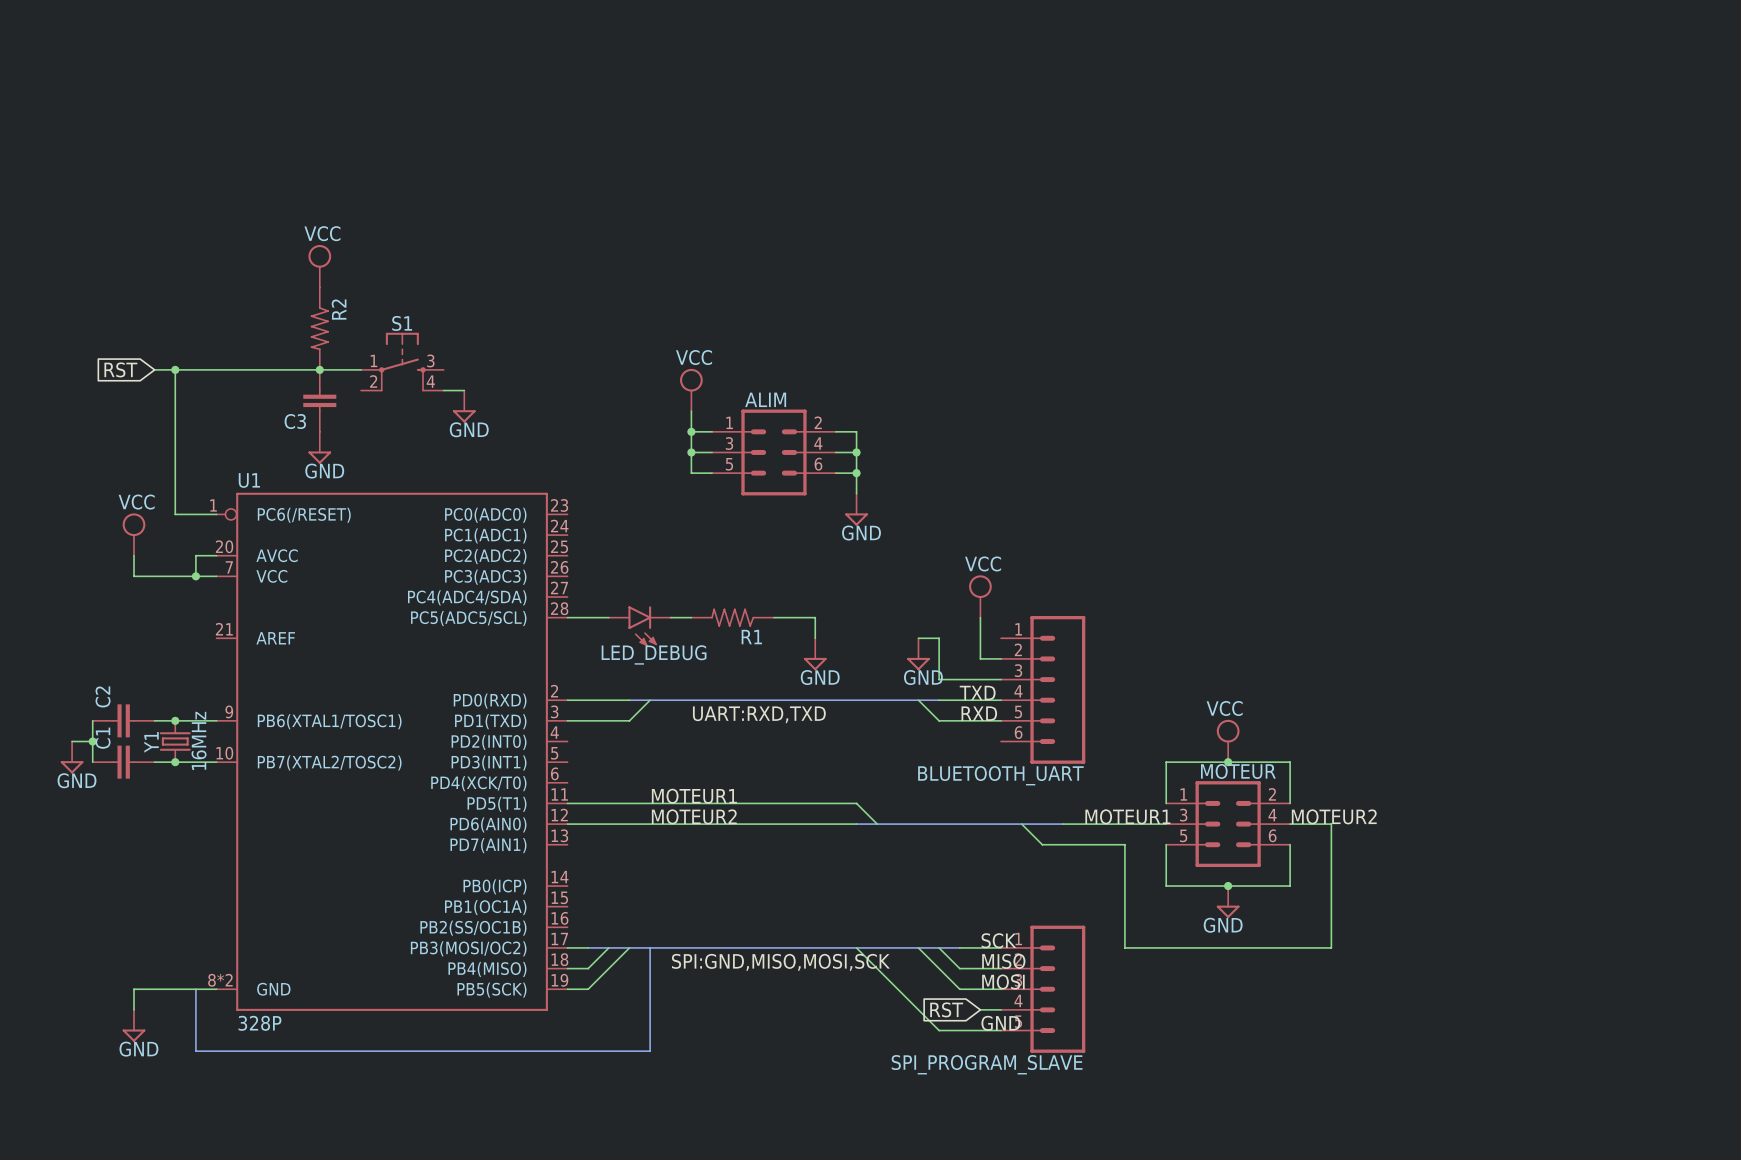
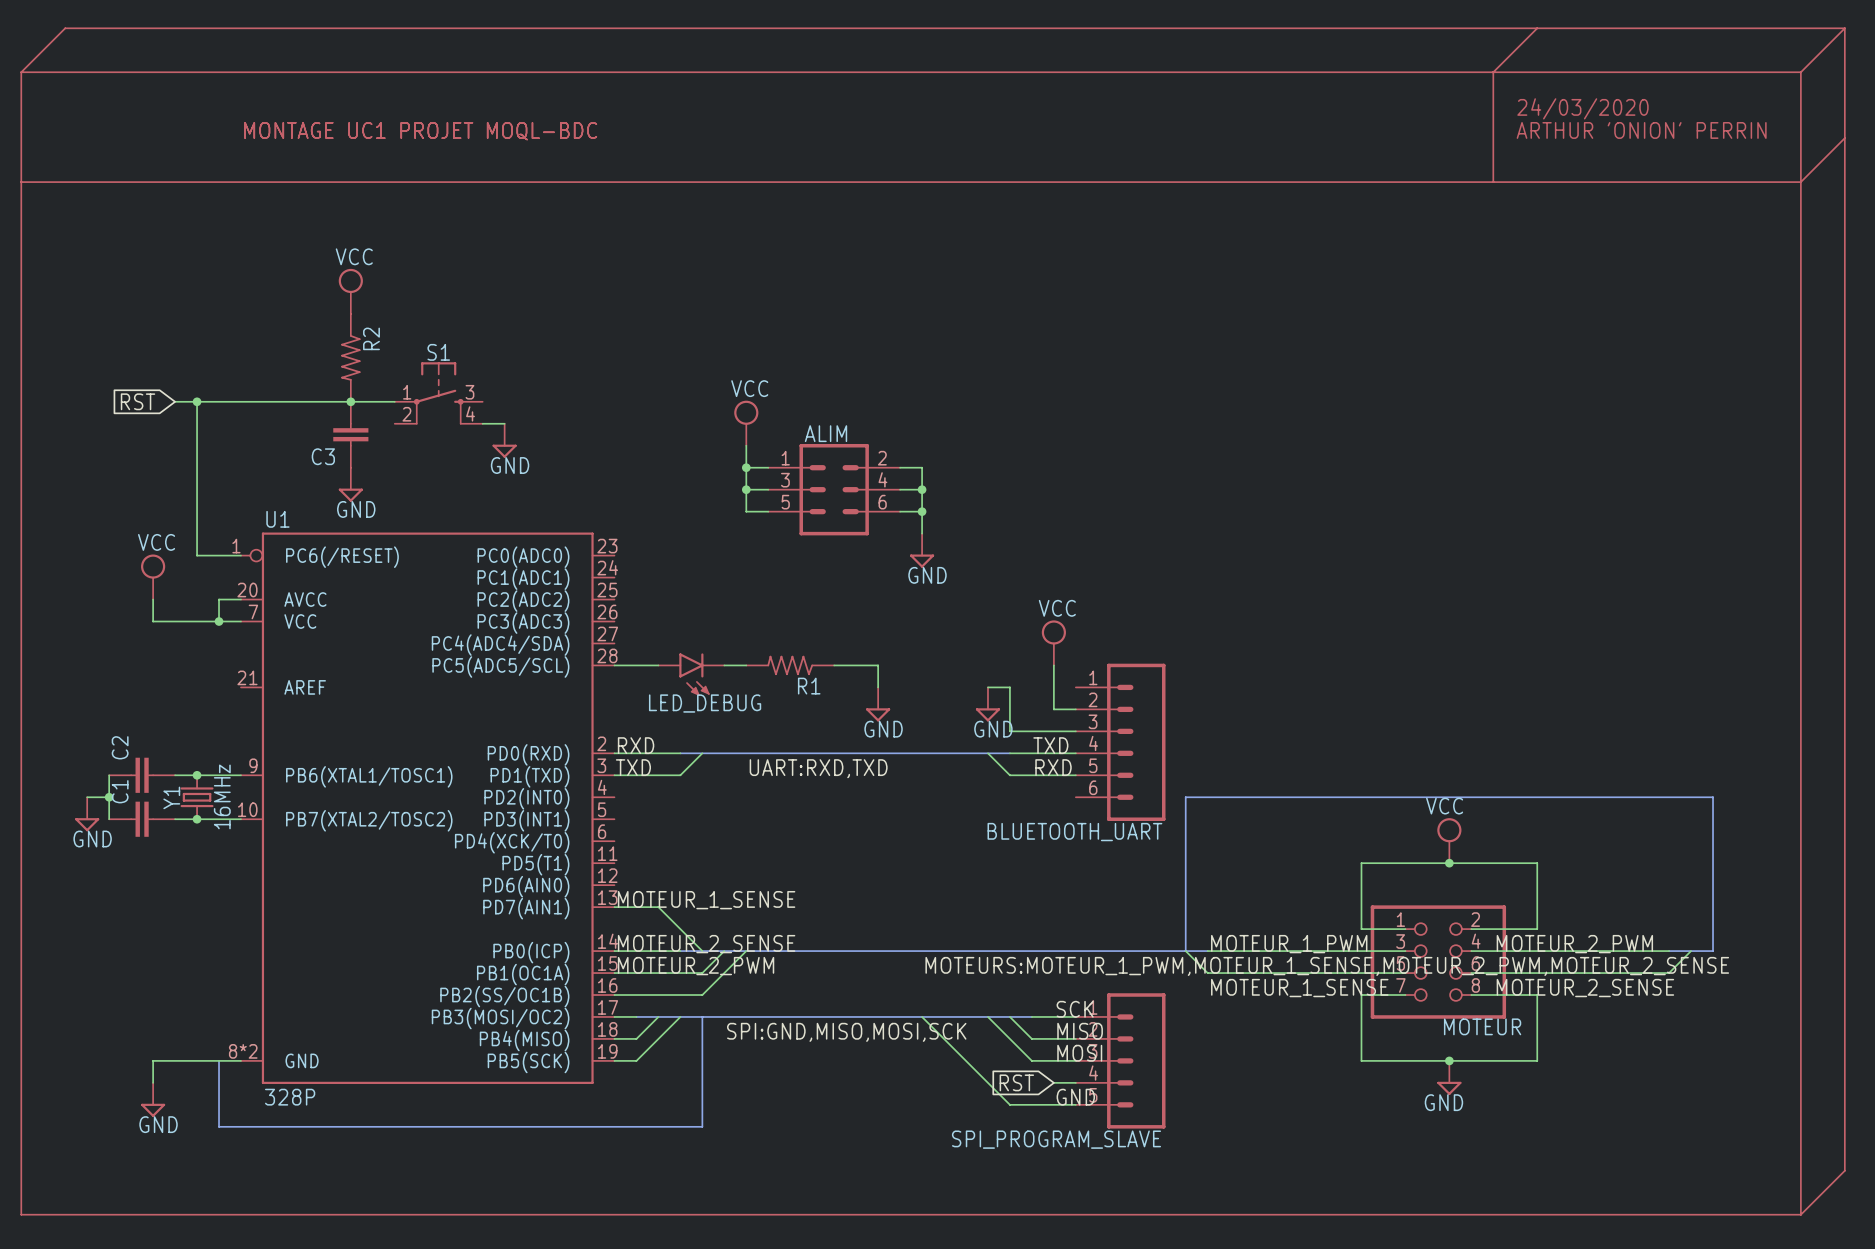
line: none -> (1537, 28) (1493, 72) (1493, 182)
line: none -> (1844, 28) (1844, 1170) (1800, 1214)
line: none -> (1844, 28) (1800, 72)
line: none -> (1844, 28) (65, 28) (21, 72)
line: none -> (21, 72) (21, 1214) (1800, 1214)
line: none -> (21, 72) (1800, 72)
line: none -> (1800, 72) (1800, 1214)
text: none -> 24/03/2020 (1582, 108)
text: none -> ARTHUR 'ONION' PERRIN (1641, 130)
text: none -> MONTAGE UC1 PROJET MOQL-BDC (420, 131)
line: none -> (1844, 138) (1800, 182) (21, 182)
label: none -> RXD (636, 745)
label: none -> TXD (633, 767)
power symbol position: VCC (1228, 740) -> VCC (1449, 840)
junction: (1228, 762) -> none
label: MOTEUR1 (694, 796) -> none
wire: (567, 803) (856, 803) (877, 824) -> none
wire: (1166, 803) (1166, 762) (1290, 762) (1290, 803) -> none
junction: none -> (1449, 863)
label: MOTEUR2 (694, 816) -> none
label: MOTEUR1 (1127, 816) -> none
label: MOTEUR2 (1334, 816) -> none
wire: (567, 824) (856, 824) -> none
bus: (856, 824) (1063, 824) -> none
wire: (1021, 824) (1042, 844) (1124, 844) (1124, 947) (1331, 947) (1331, 824) (1290, 824) -> none
wire: (1063, 824) (1166, 824) -> none
MOTEUR: (1228, 824) -> none
label: none -> MOTEUR_1_SENSE (706, 900)
wire: none -> (614, 907) (658, 907) (702, 951)
wire: (1166, 844) (1166, 886) -> (1207, 951) (1251, 951)
wire: (1290, 844) (1290, 886) -> (1405, 951) (1383, 951)
wire: none -> (1405, 929) (1361, 929) (1361, 863) (1537, 863) (1537, 929) (1471, 929)
label: none -> MOTEUR_2_SENSE (706, 944)
label: none -> MOTEUR_1_PWM (1289, 944)
label: none -> MOTEUR_2_PWM (1574, 944)
wire: none -> (614, 951) (680, 951)
bus: none -> (680, 951) (1207, 951)
wire: none -> (724, 951) (702, 973) (614, 973)
wire: none -> (746, 951) (702, 995) (614, 995)
bus: none -> (1185, 951) (1185, 797) (1713, 797) (1713, 951) (1669, 951)
wire: none -> (1185, 951) (1207, 973) (1405, 973)
junction: (1228, 886) -> none
wire: none -> (1471, 951) (1669, 951)
wire: none -> (1691, 951) (1669, 973) (1471, 973)
MOTEUR: none -> (1438, 962)
label: none -> MOTEUR_2_PWM (696, 966)
label: none -> MOTEURS:MOTEUR_1_PWM,MOTEUR_1_SENSE,MOTEUR_2_PWM,MOTEUR_2_SENSE (1327, 966)
power symbol position: GND (1228, 902) -> GND (1449, 1077)
label: none -> MOTEUR_1_SENSE (1299, 988)
label: none -> MOTEUR_2_SENSE (1585, 988)
wire: none -> (1405, 995) (1361, 995) (1361, 1060) (1537, 1060) (1537, 995) (1471, 995)
junction: none -> (1449, 1060)

